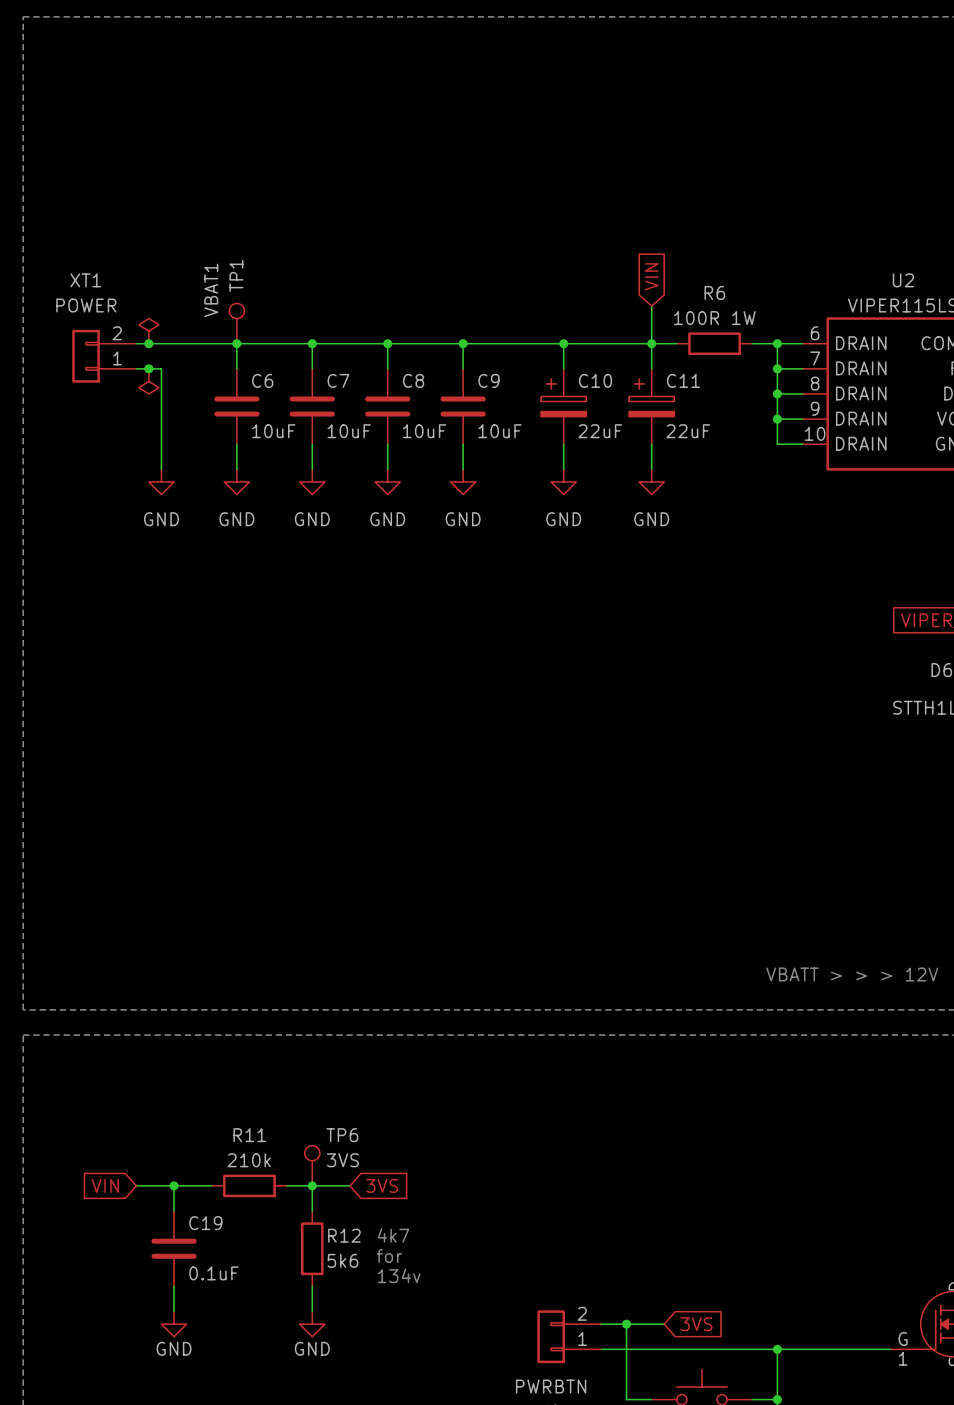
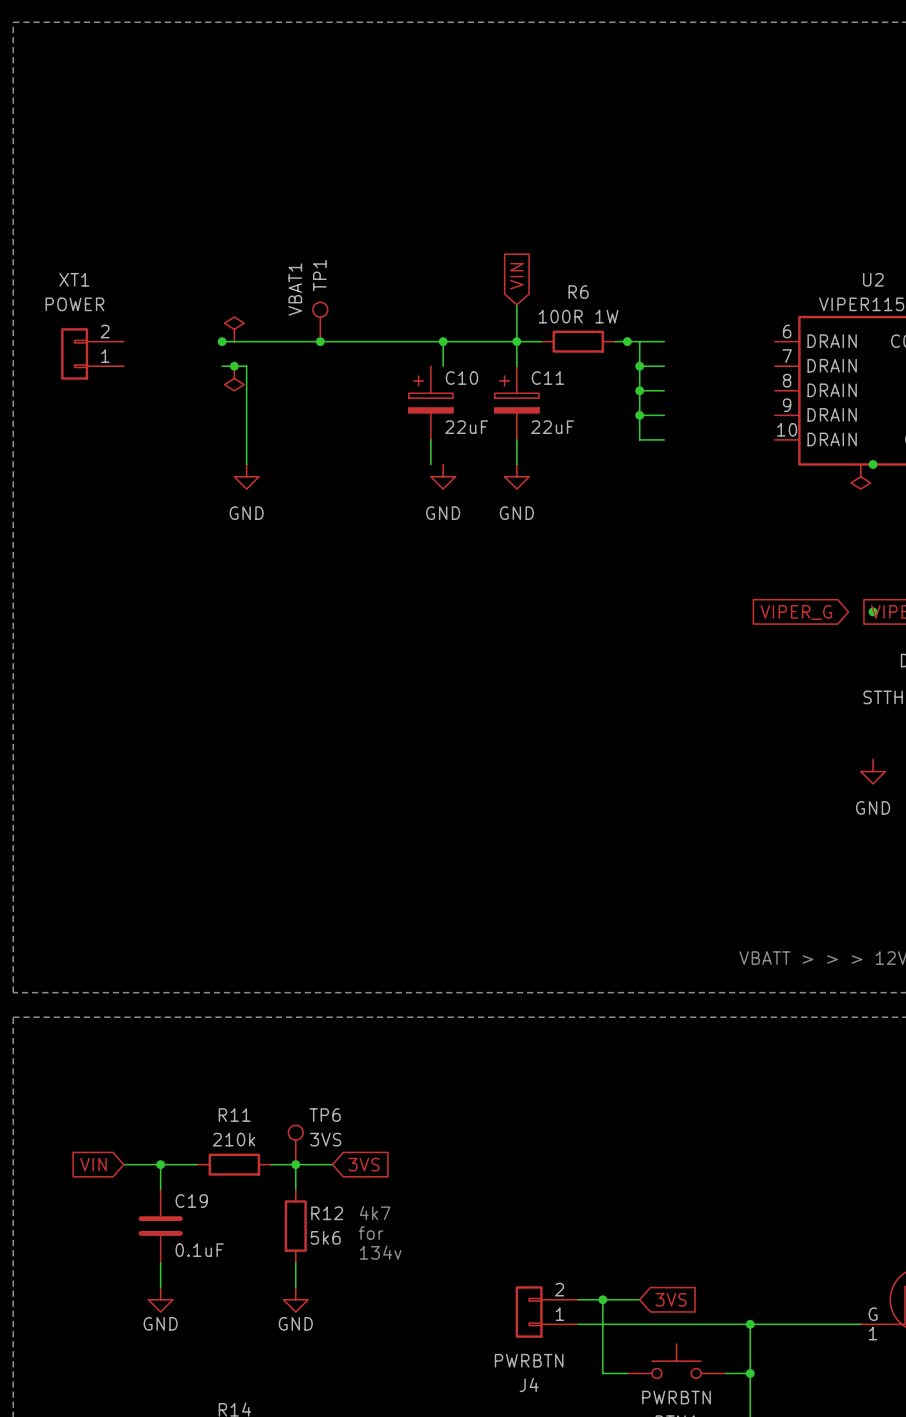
global label position: VIN (651, 276) -> VIN (516, 276)
wire: (651, 305) (651, 368) -> (516, 304) (516, 366)
TP1 position: (236, 323) -> (320, 322)
power symbol: (148, 331) -> none
power symbol: none -> (234, 329)
wire: (136, 343) (236, 343) (236, 368) -> (246, 464) (246, 366) (222, 366)
junction: (148, 343) -> none
wire: (312, 343) (312, 368) -> none
junction: (312, 343) -> none
junction: none -> (320, 341)
wire: (387, 343) (387, 368) -> none
junction: (387, 343) -> none
junction position: (563, 343) -> (516, 341)
wire: (639, 343) (563, 343) (563, 368) -> none
R6 position: (714, 343) -> (578, 341)
wire: (752, 343) (802, 343) -> none
wire: (777, 343) (777, 444) (802, 444) -> (639, 341) (639, 439) (664, 439)
junction: (777, 343) -> none
wire: (136, 368) (161, 368) (161, 469) -> none
junction: (148, 368) -> none
junction: none -> (234, 366)
junction: none -> (639, 366)
wire: (777, 368) (802, 368) -> (639, 366) (664, 366)
junction: (777, 368) -> none
power symbol: (148, 381) -> none
power symbol: none -> (234, 378)
junction: none -> (639, 390)
wire: (777, 393) (802, 393) -> (639, 390) (664, 390)
junction: (777, 393) -> none
C6: 10uF (236, 406) -> none
C7: 10uF (312, 406) -> none
C8: 10uF (387, 406) -> none
C9: 10uF (463, 406) -> none
C10 position: (563, 406) -> (430, 403)
C11 position: (651, 406) -> (516, 403)
junction: none -> (639, 415)
wire: (777, 419) (802, 419) -> (639, 415) (664, 415)
junction: (777, 419) -> none
wire: (236, 444) (236, 469) -> none
wire: (312, 444) (312, 469) -> none
wire: (387, 444) (387, 469) -> none
wire: (463, 444) (463, 469) -> none
wire: (563, 444) (563, 469) -> (430, 439) (430, 464)
wire: (651, 444) (651, 469) -> (516, 439) (516, 464)
junction: none -> (873, 464)
power symbol: GND (161, 481) -> none
power symbol: GND (236, 481) -> none
power symbol: none -> GND (246, 476)
power symbol: GND (312, 481) -> none
power symbol: GND (387, 481) -> none
power symbol position: GND (563, 481) -> GND (516, 476)
power symbol: GND (651, 481) -> none
power symbol: none -> (860, 476)
global label: none -> VIPER_G (796, 612)
junction: none -> (873, 611)
power symbol: none -> GND (873, 771)

